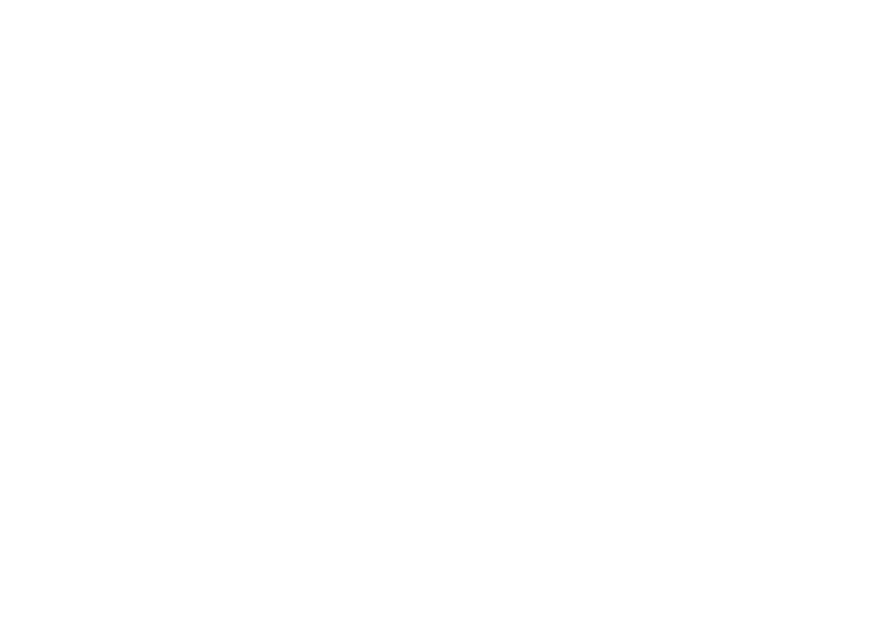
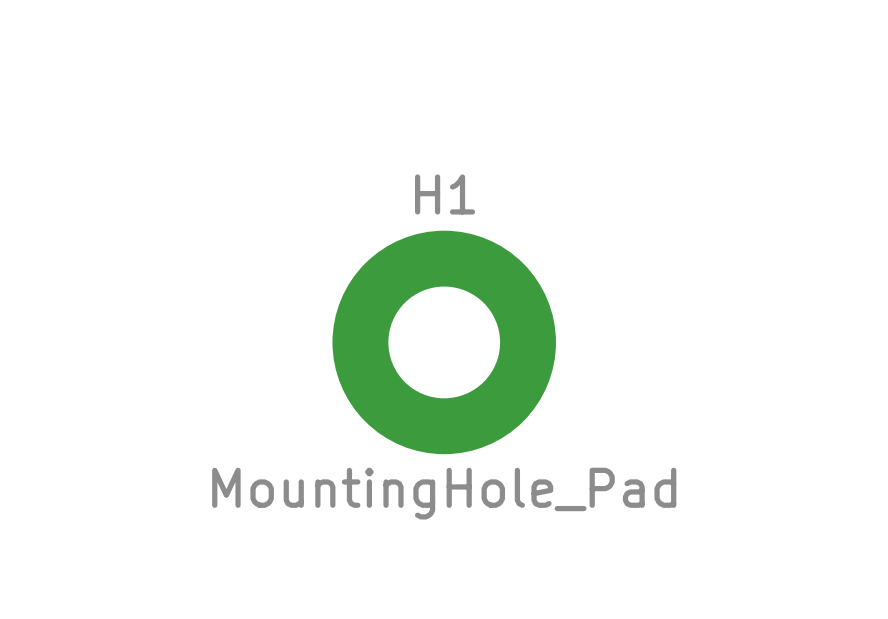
H1: none -> MountingHole_Pad (444, 342)

